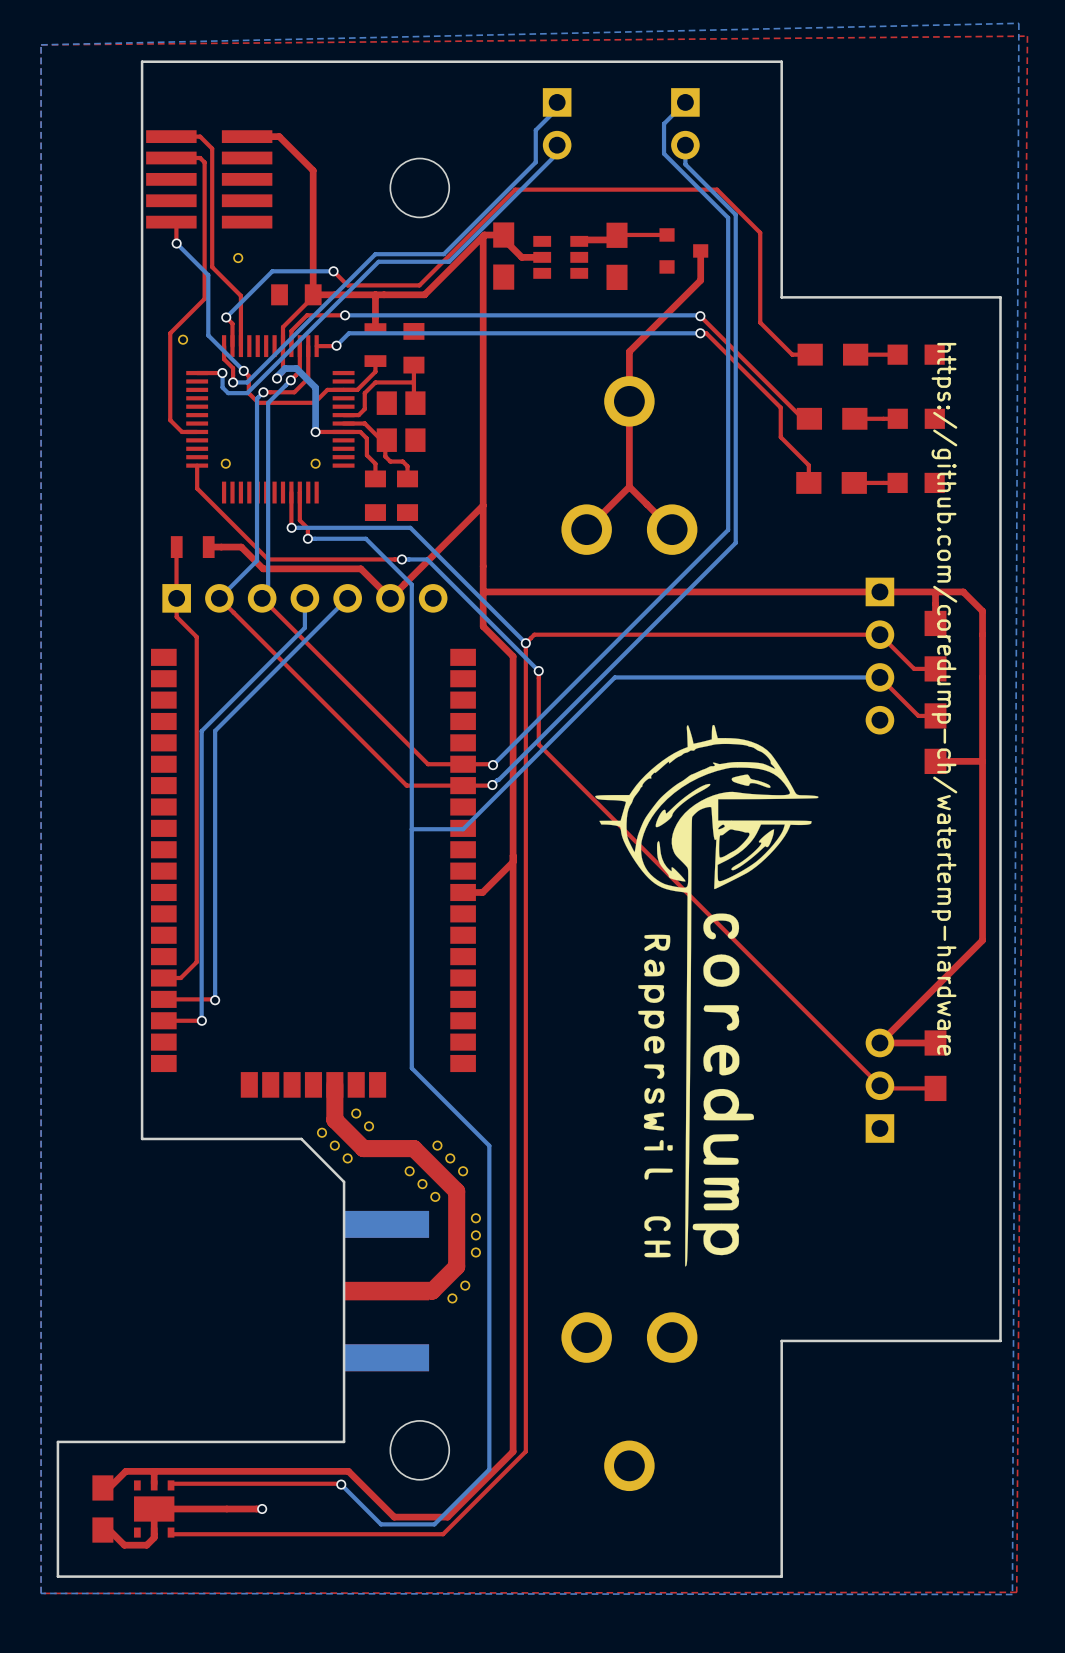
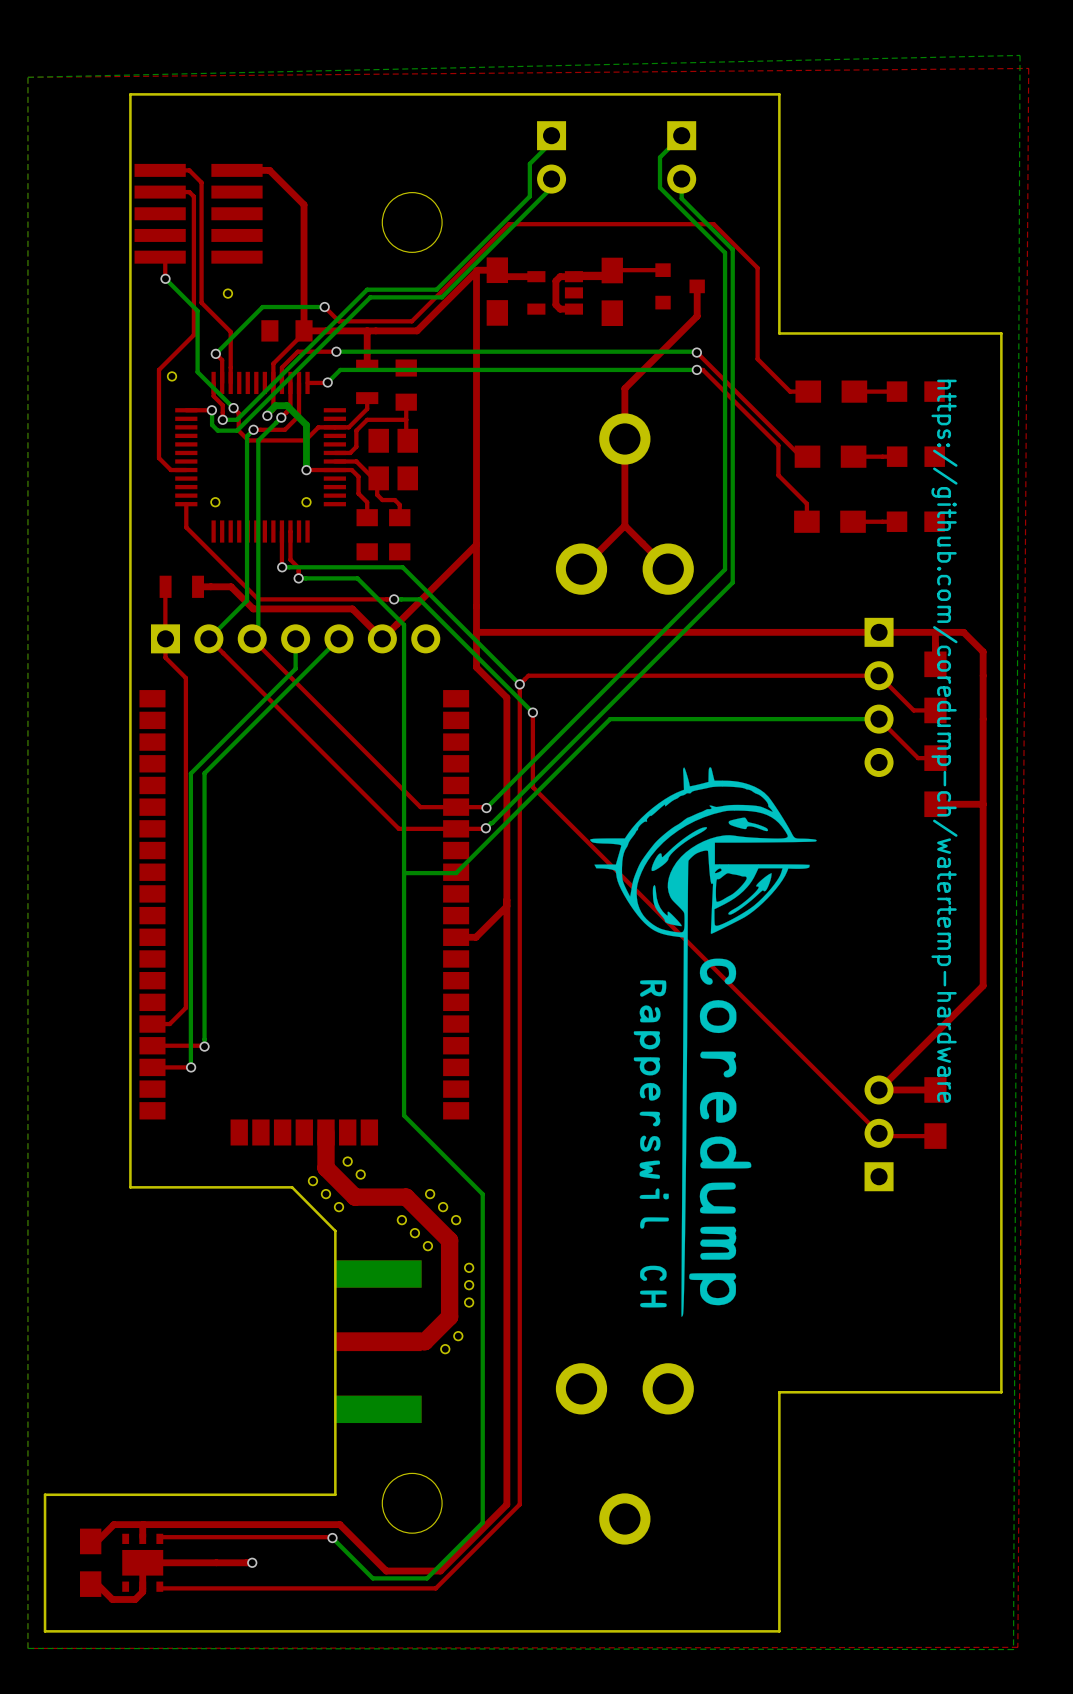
top track: none -> (497, 270) (503, 276) (536, 276)
part footprint: [533, 235, 589, 279] -> [527, 271, 583, 315]
top track: none -> (612, 270) (606, 276) (560, 276) (555, 281) (555, 304) (560, 309) (573, 309)
top track: (503, 239) (521, 257) (542, 257) -> none

